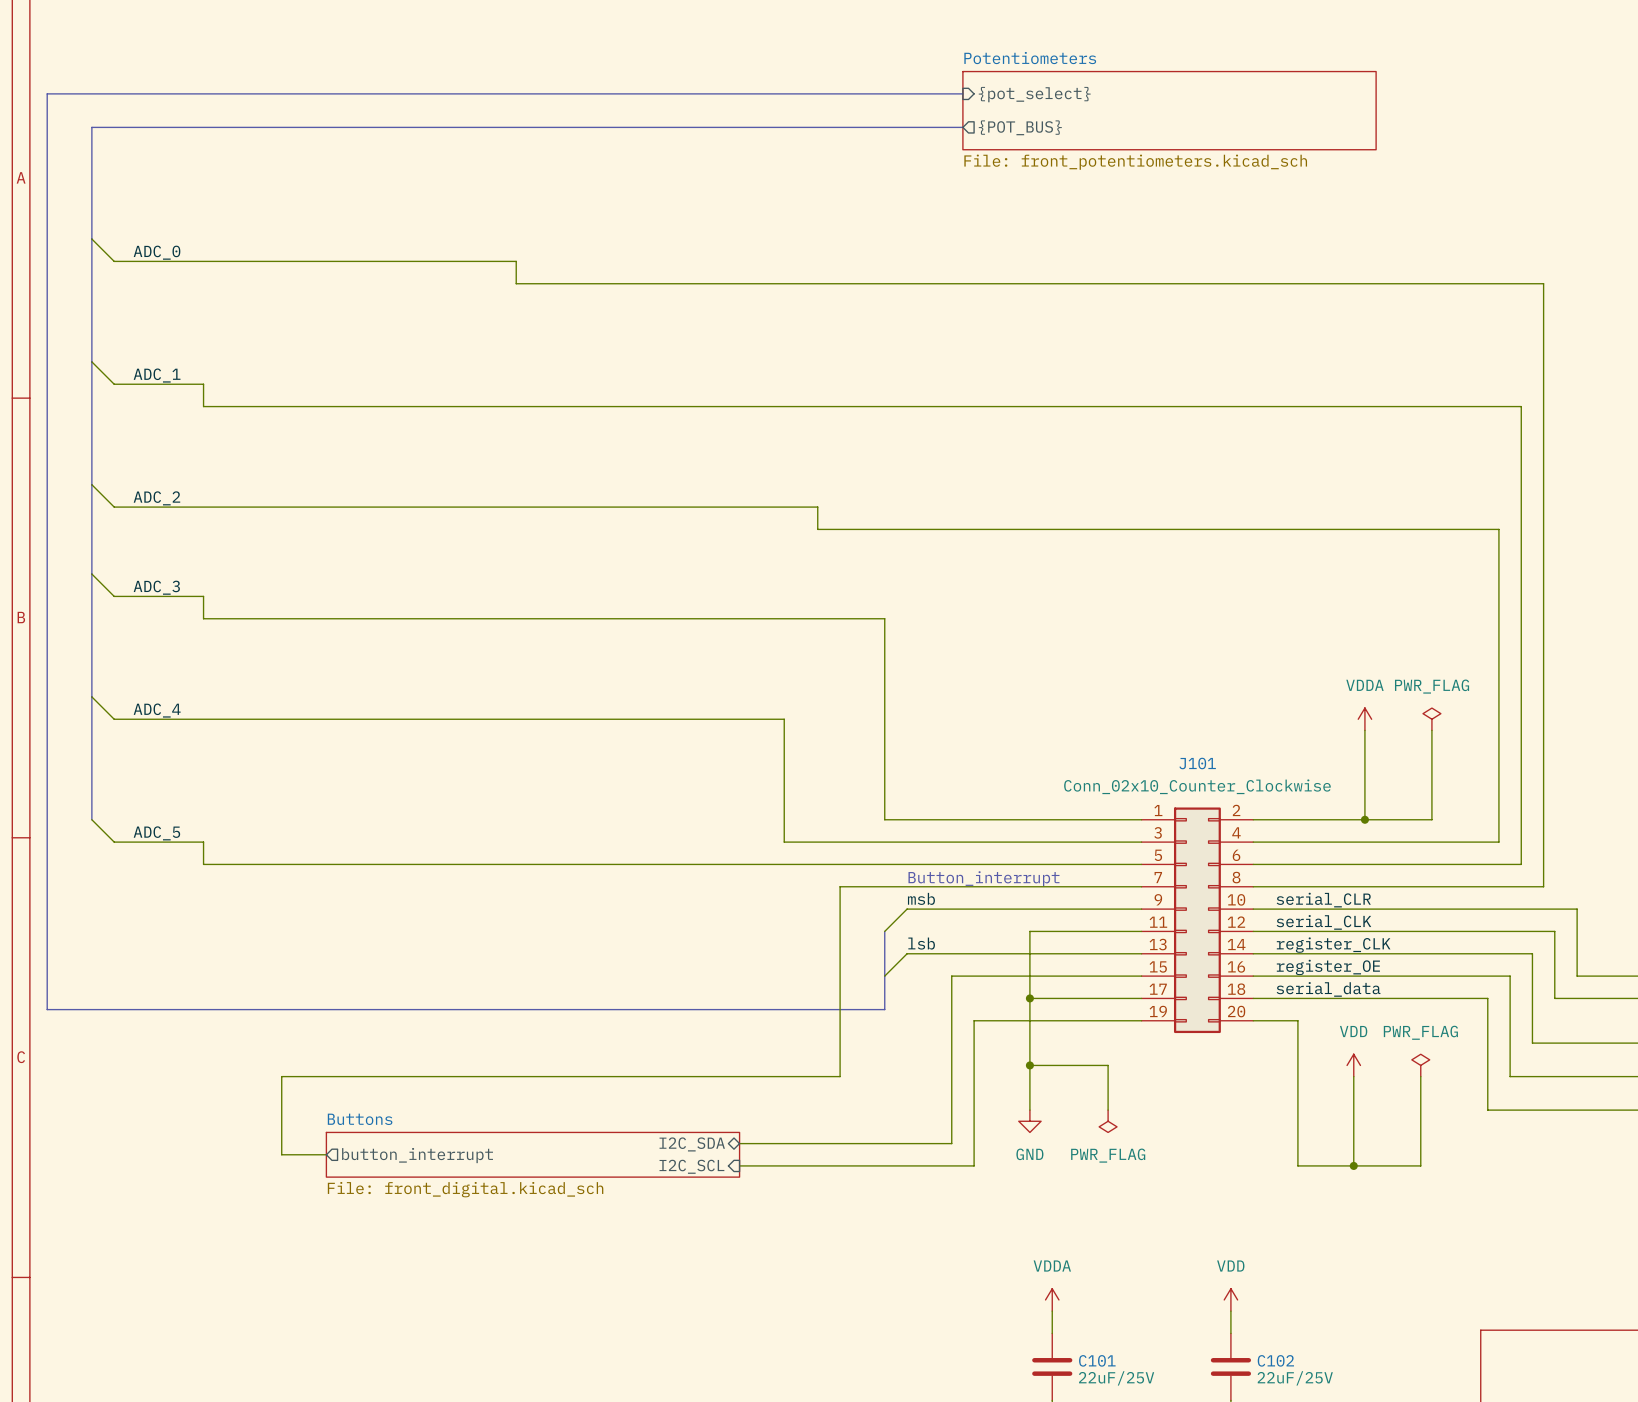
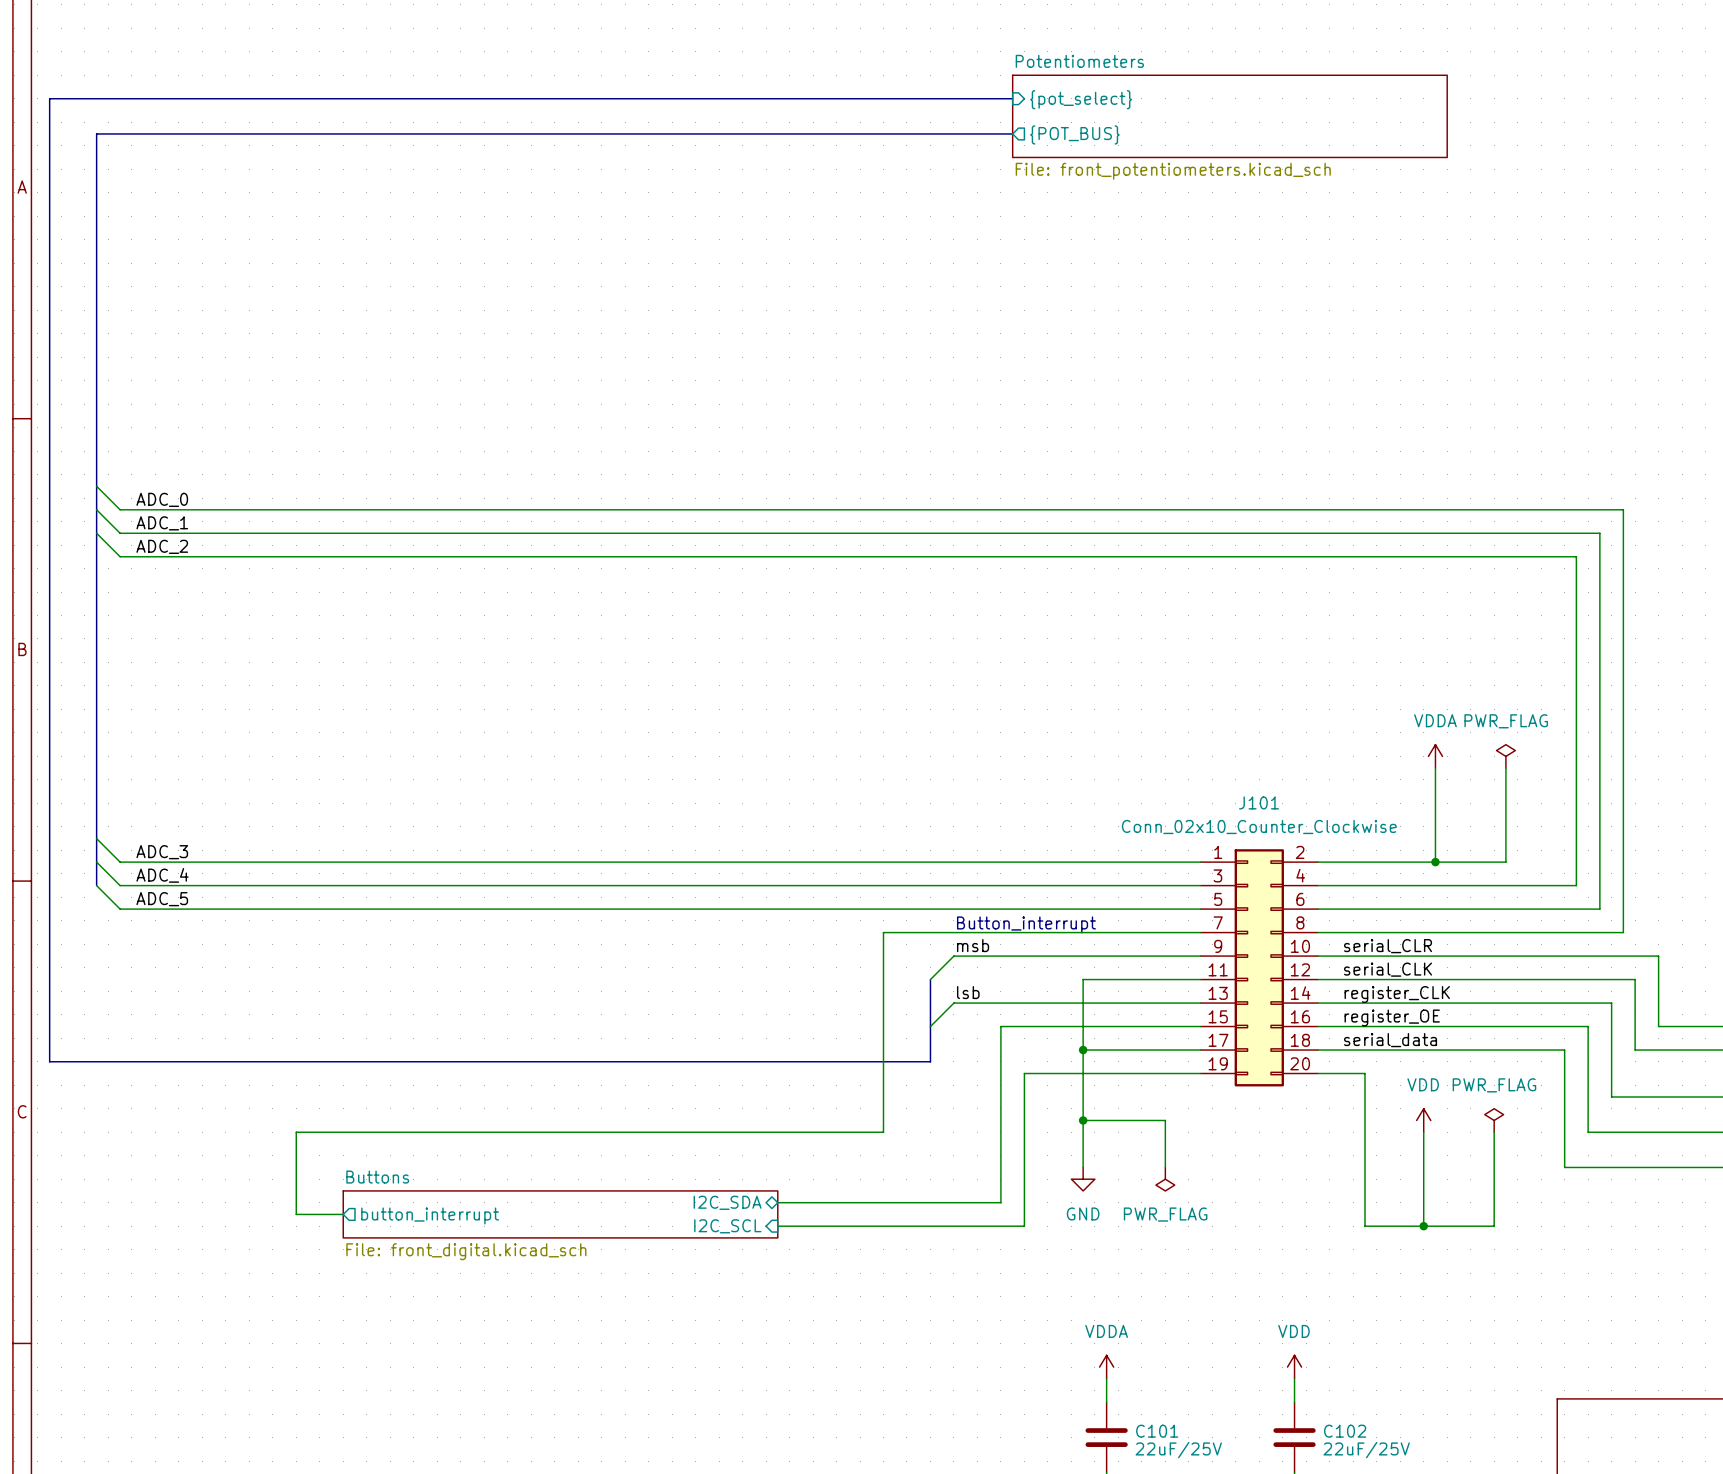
wire: (91, 239) (114, 261) (516, 261) (516, 283) (1543, 283) (1543, 484) -> (96, 486) (120, 509) (1623, 509)
label: ADC_0 (157, 252) -> none
wire: (91, 361) (114, 384) (203, 384) (203, 406) (1521, 406) (1521, 507) -> none
label: ADC_1 (157, 375) -> none
label: none -> ADC_0 (162, 499)
label: ADC_2 (156, 498) -> ADC_1 (162, 523)
wire: none -> (96, 533) (120, 556) (860, 556)
wire: (817, 507) (817, 529) -> (860, 533) (1599, 533)
label: none -> ADC_2 (162, 546)
wire: (91, 574) (114, 596) (203, 596) (203, 618) (884, 618) (884, 819) -> (96, 838) (120, 862) (930, 862)
label: ADC_3 (156, 587) -> none
wire: (91, 696) (114, 719) (784, 719) (784, 842) -> (214, 885) (824, 885)
label: ADC_4 (157, 710) -> none
label: none -> ADC_3 (162, 852)
bus: none -> (96, 862) (96, 885)
label: ADC_5 (156, 833) -> ADC_4 (162, 875)
wire: (203, 842) (203, 864) -> (96, 885) (120, 909) (214, 909)
label: none -> ADC_5 (162, 899)

